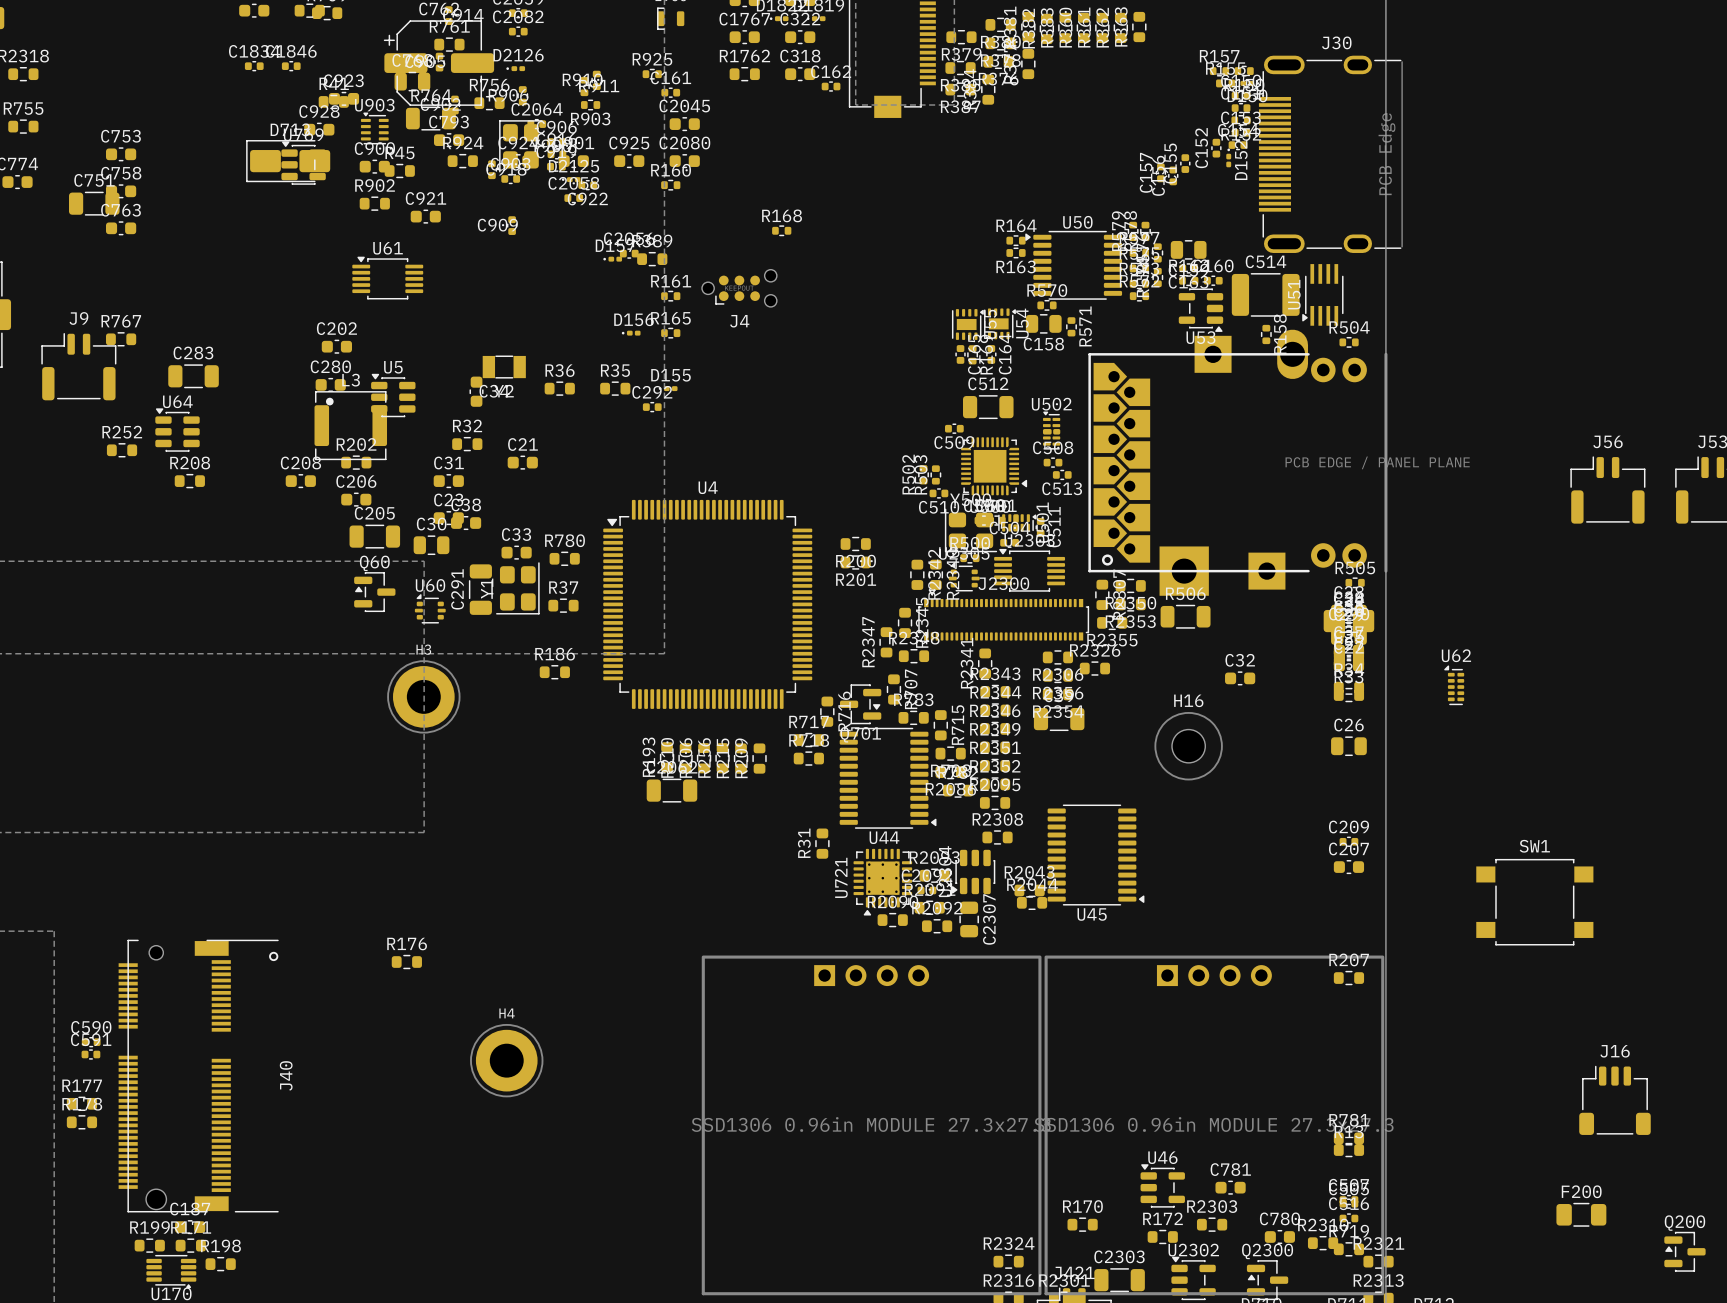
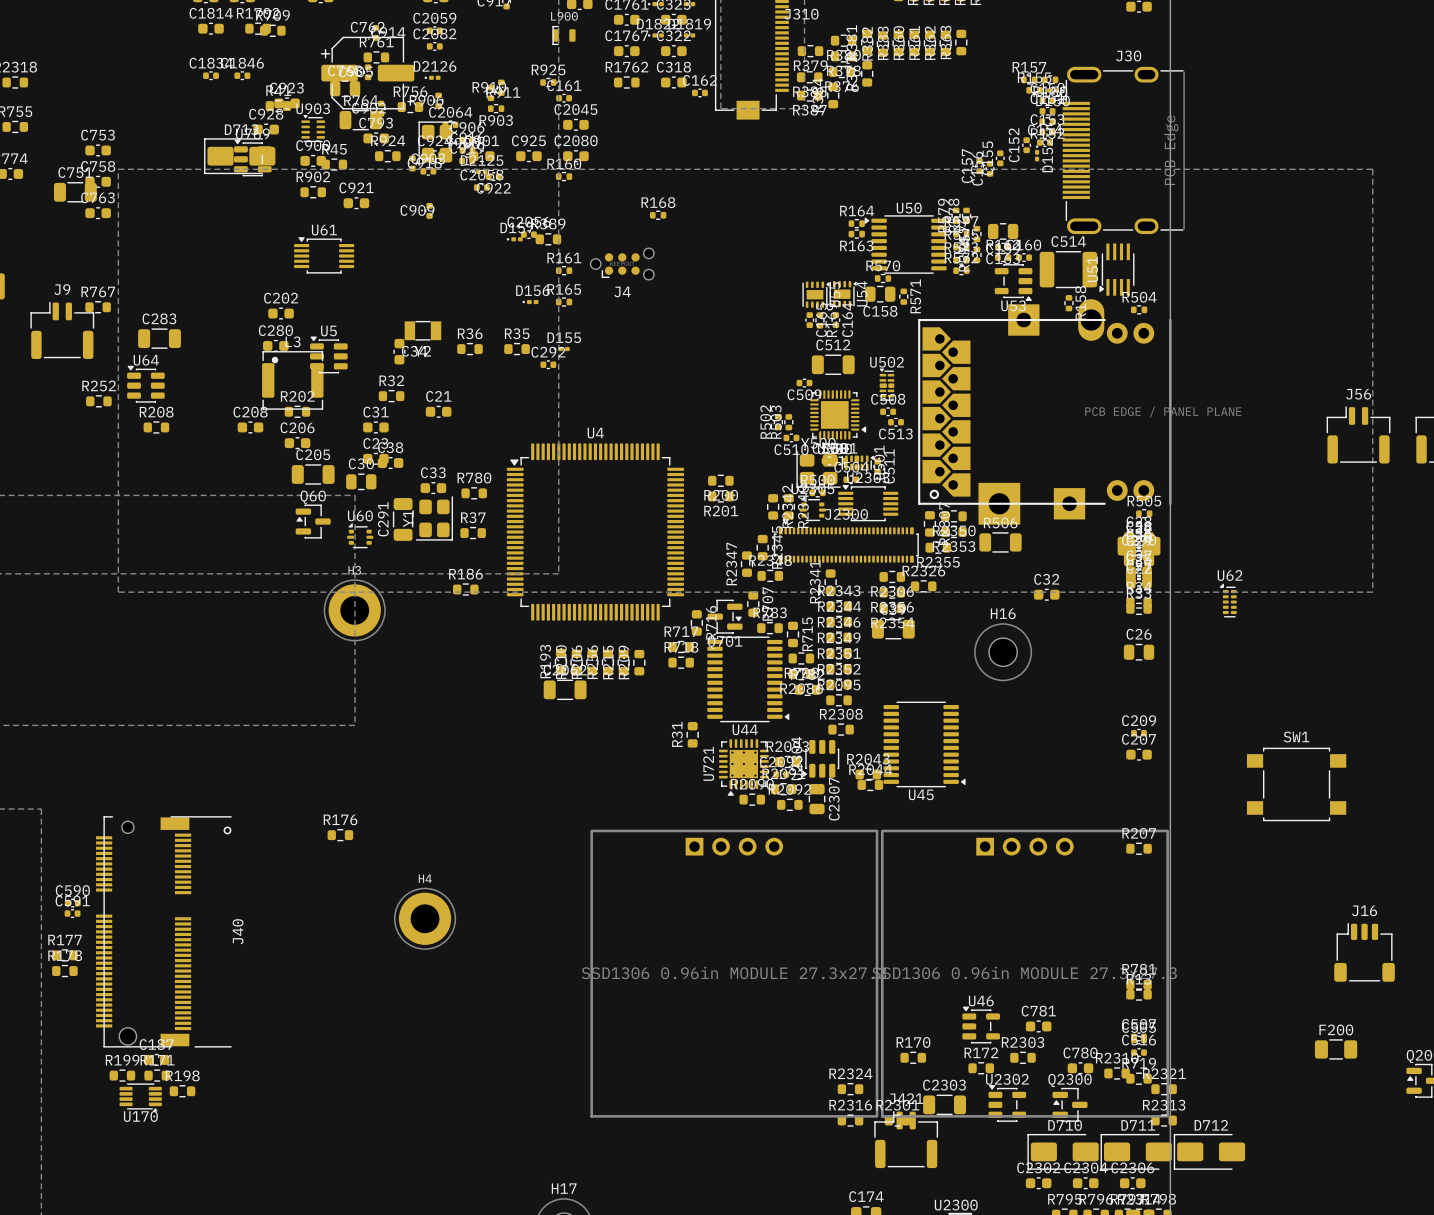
line: none -> (118, 169) (1372, 169) (1372, 592) (118, 592) (118, 169)

